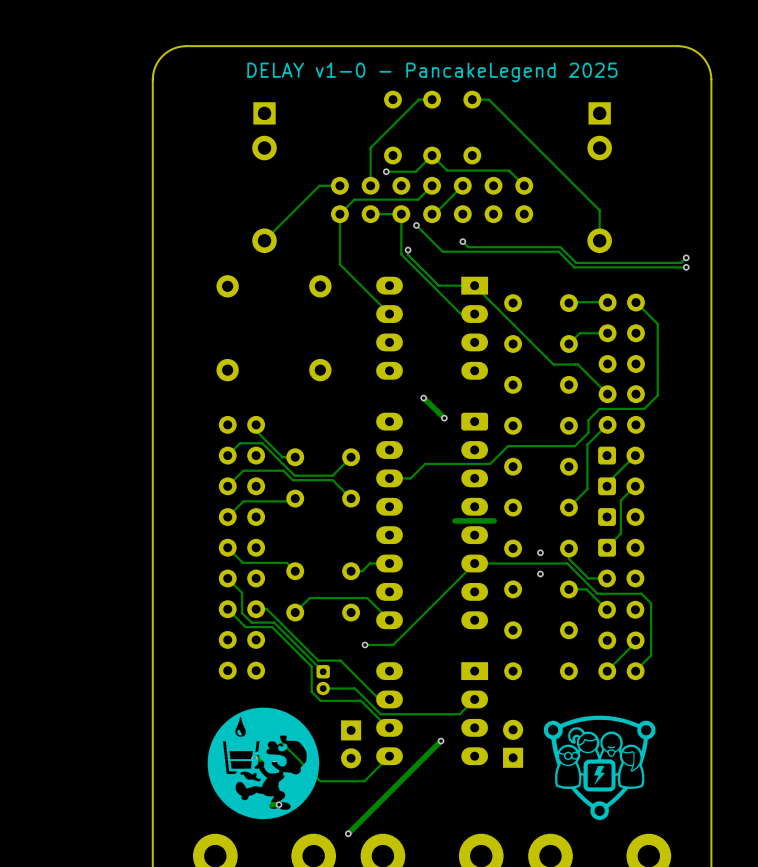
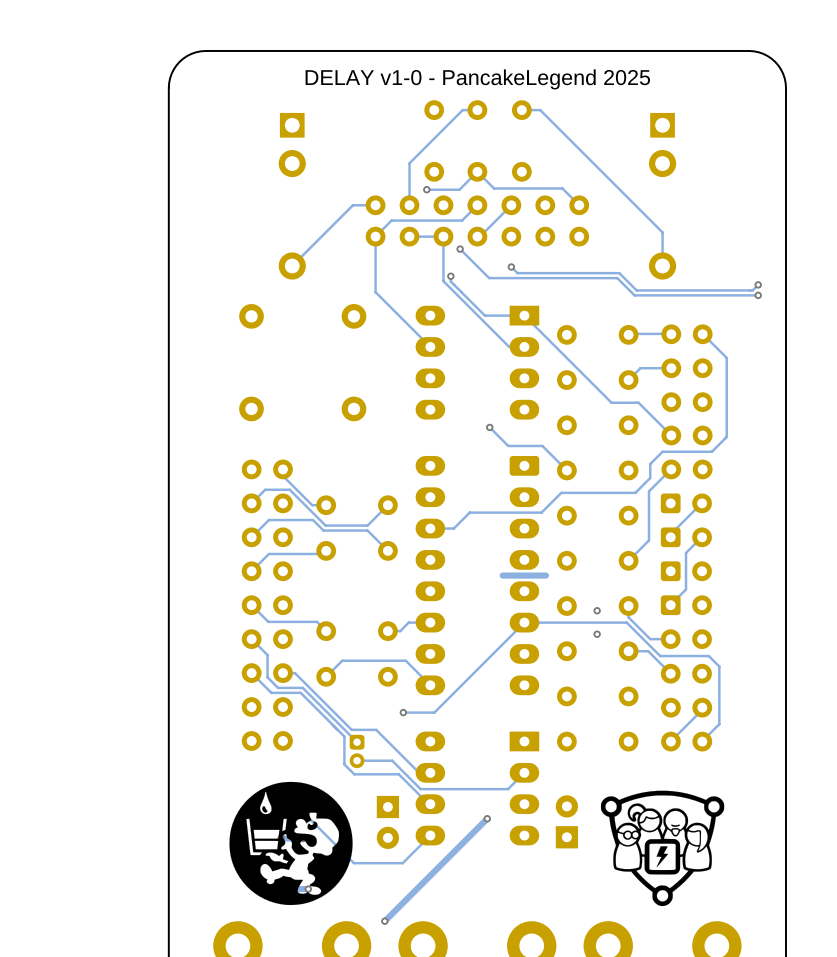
track: none -> (489, 427) (508, 445) (542, 445) (566, 470)
via: none -> (489, 427)
track: (423, 398) (444, 418) -> none
via: (423, 398) -> none
via: (444, 418) -> none

